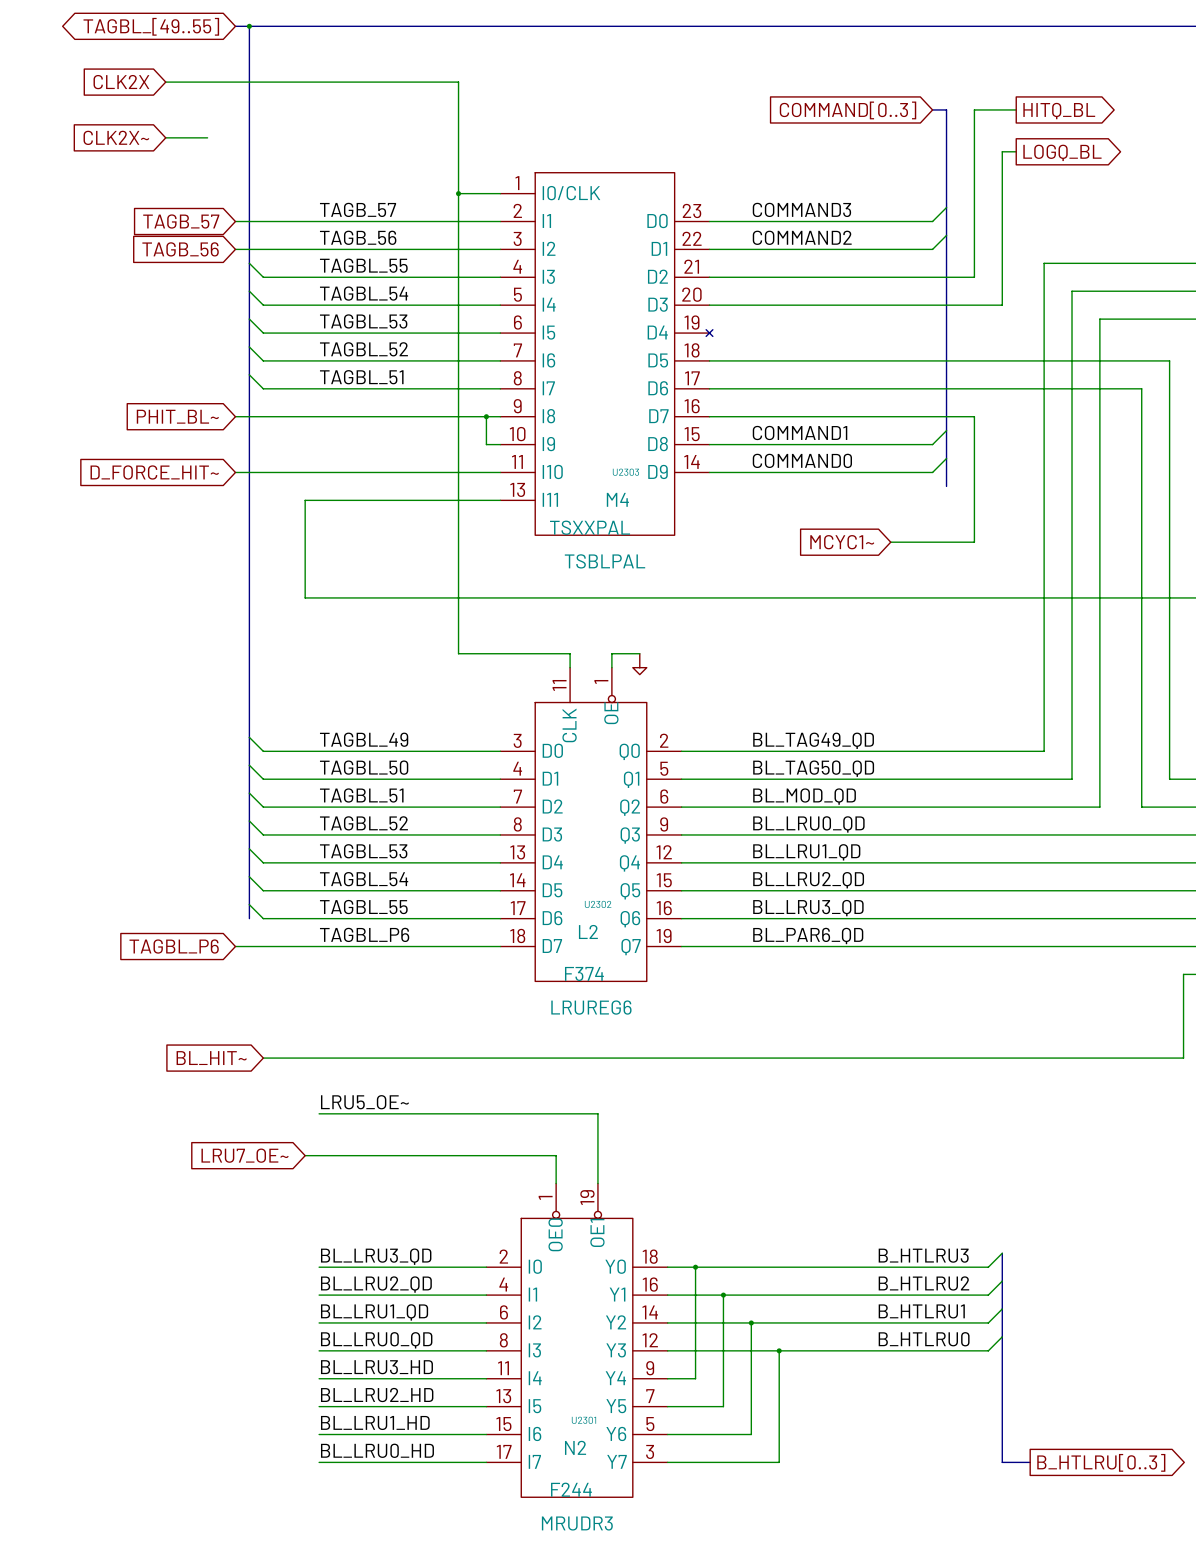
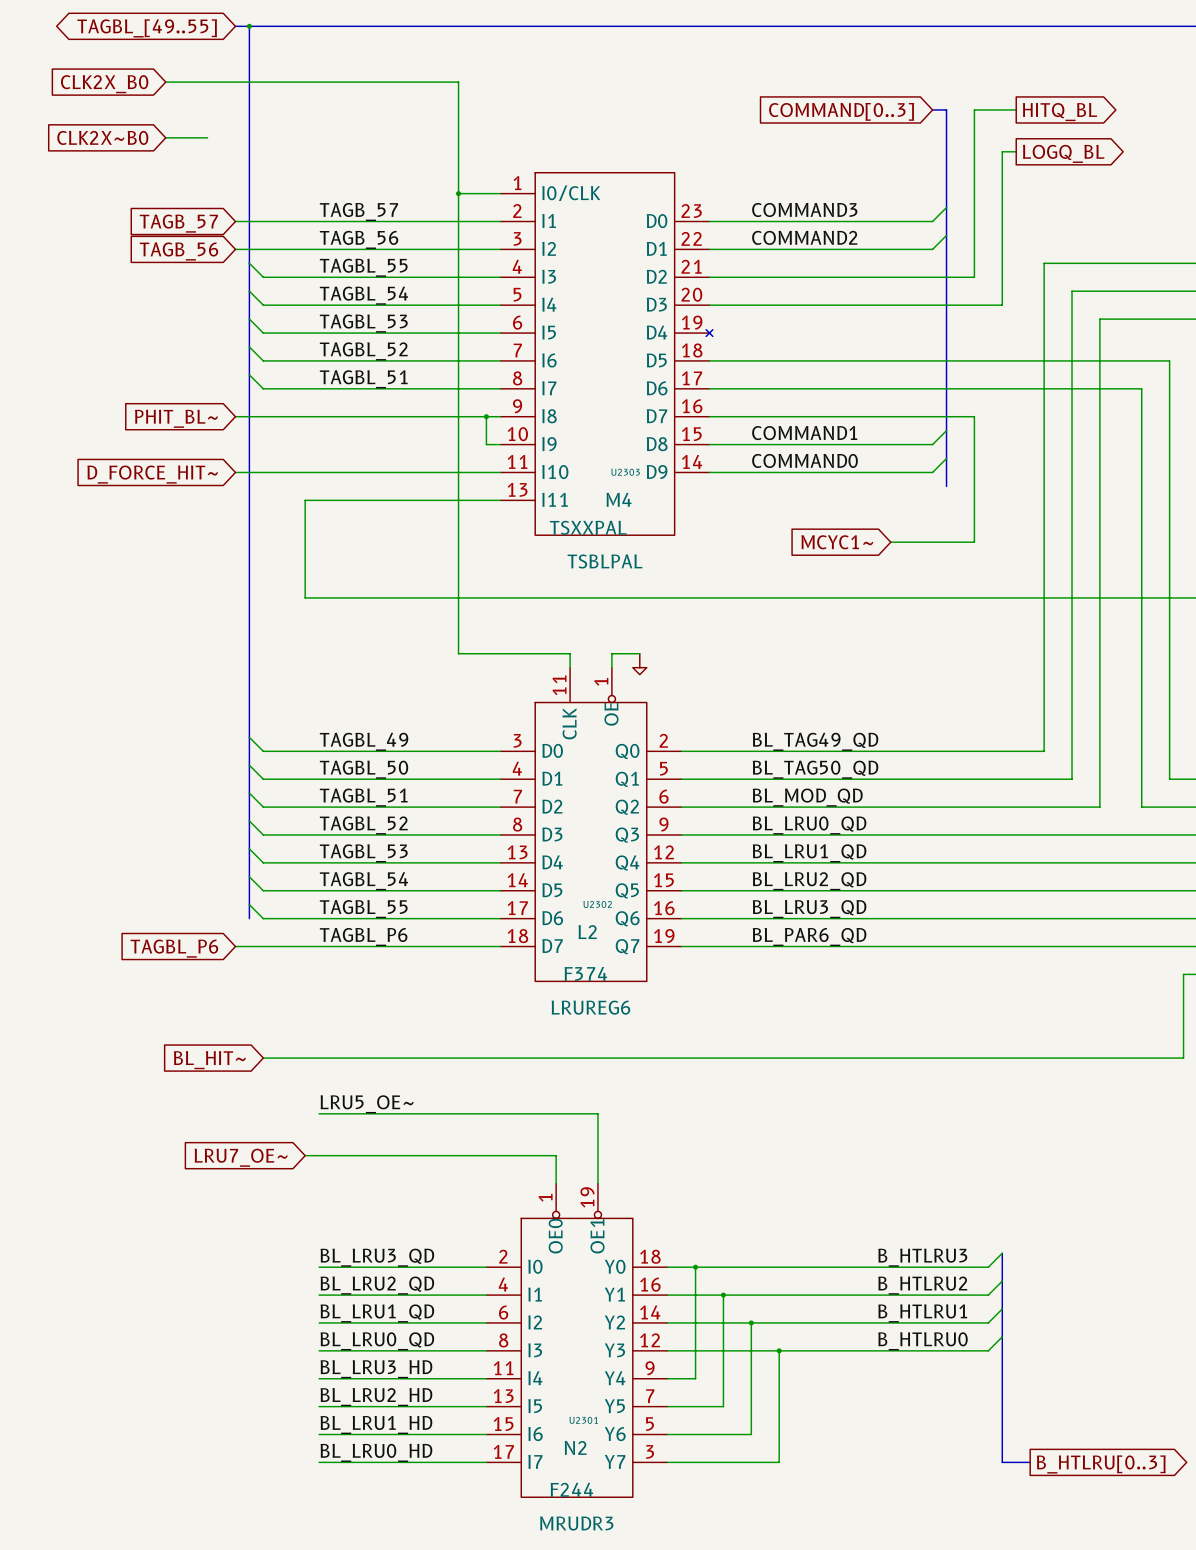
global label: CLK2X (121, 82) -> CLK2X_B0 (104, 84)
global label: CLK2X~ (116, 137) -> CLK2X~B0 (102, 137)

